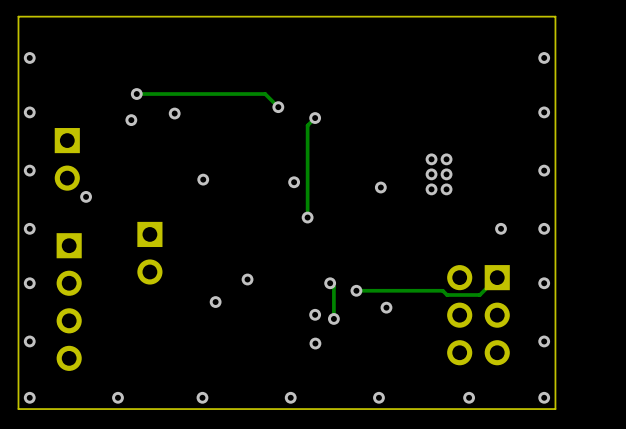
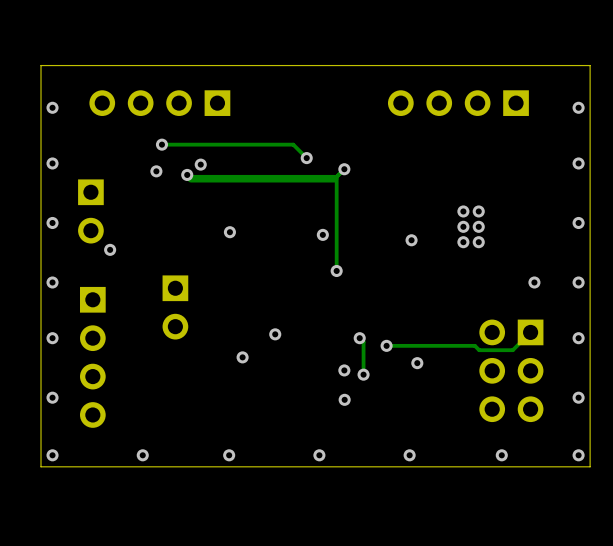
part: none -> (159, 103)
part: none -> (458, 103)
track: none -> (344, 169) (334, 178) (191, 178) (187, 174)
via: none -> (187, 174)

